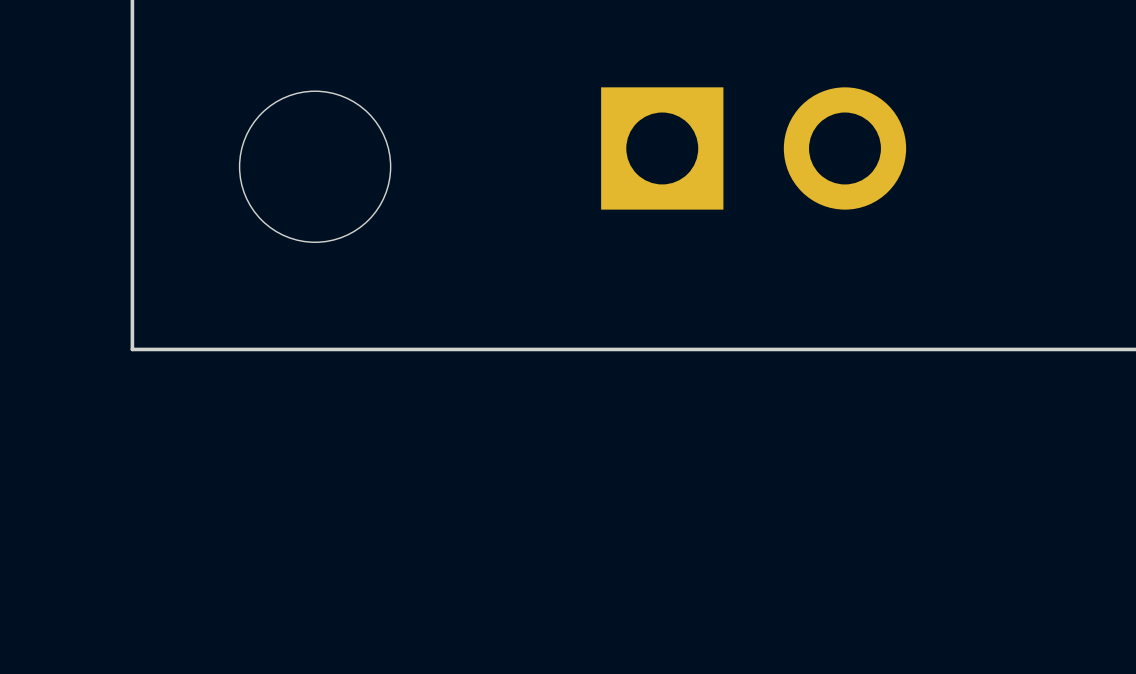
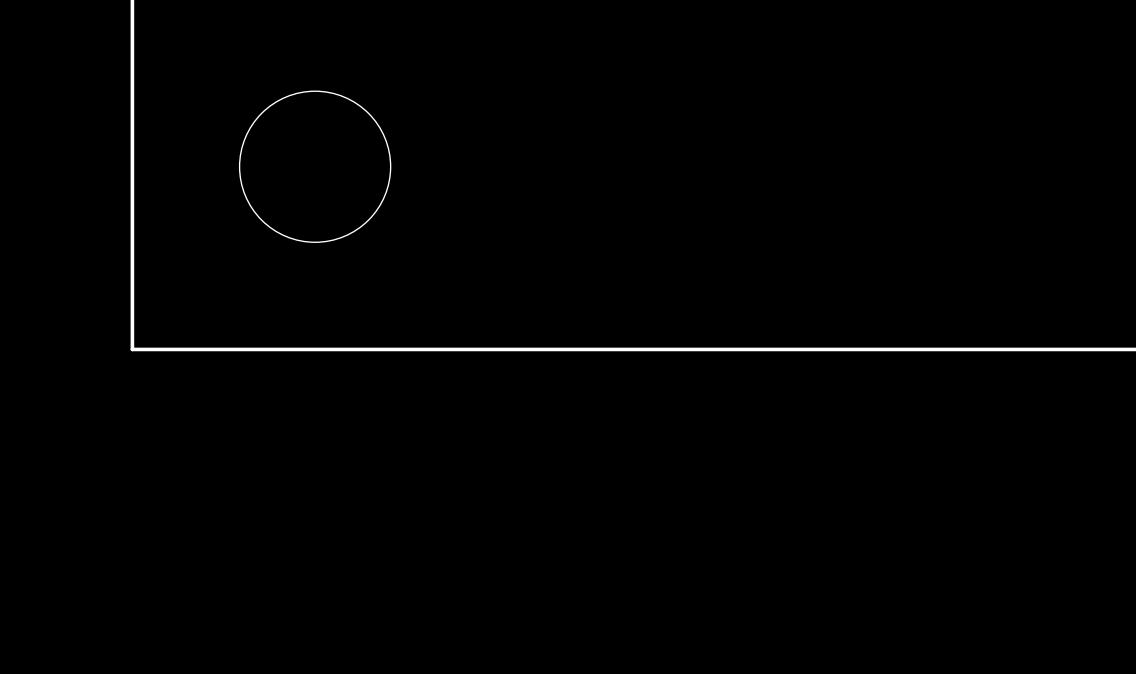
part: (753, 148) -> none

